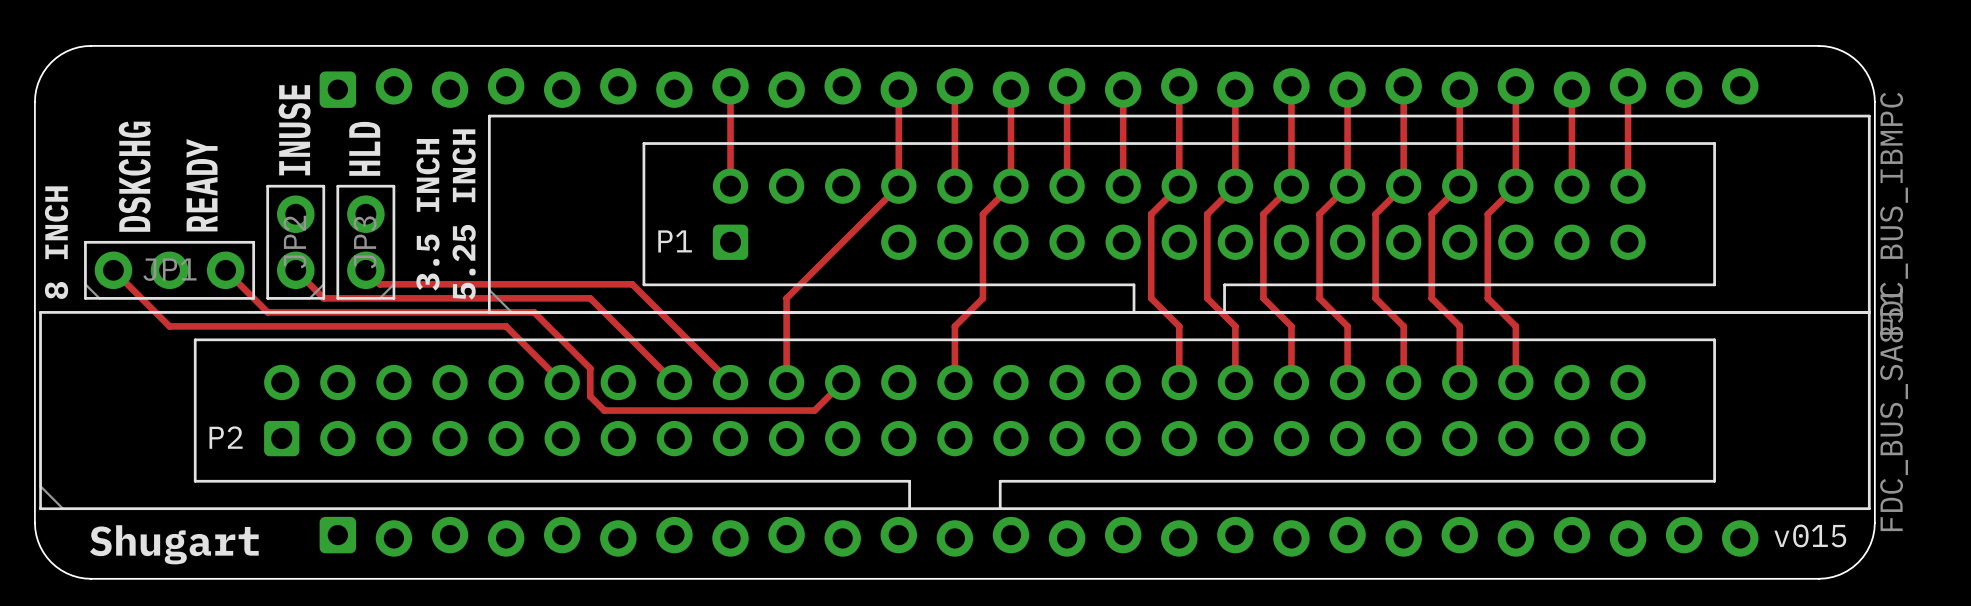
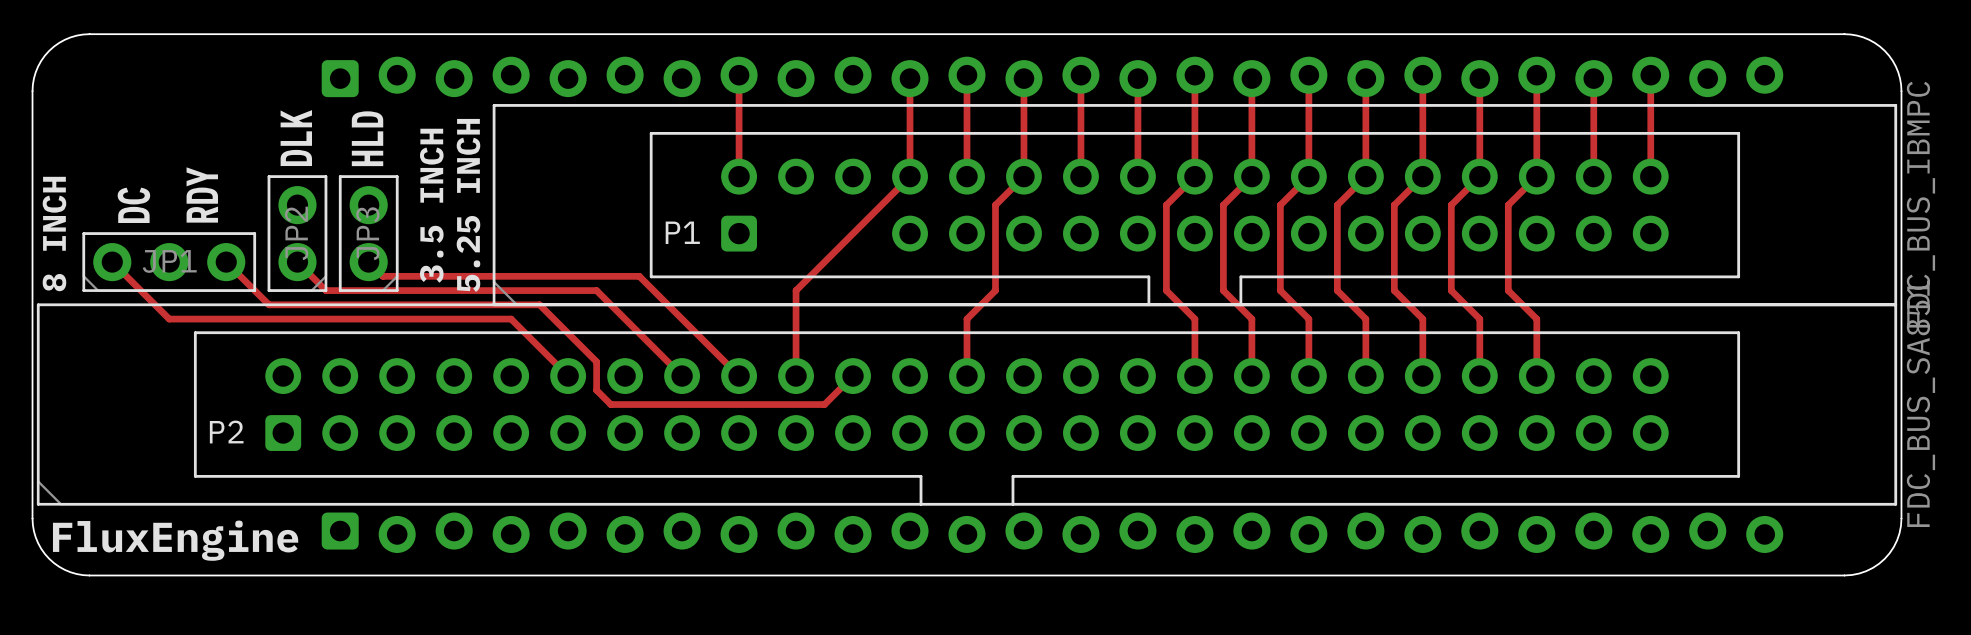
text: INUSE (294, 130) -> DLK (296, 138)
text: DSKCHG (134, 176) -> DC (133, 205)
text: READY (202, 185) -> RDY (202, 194)
text: v015 (1810, 535) -> none
text: Shugart (174, 544) -> FluxEngine (175, 540)

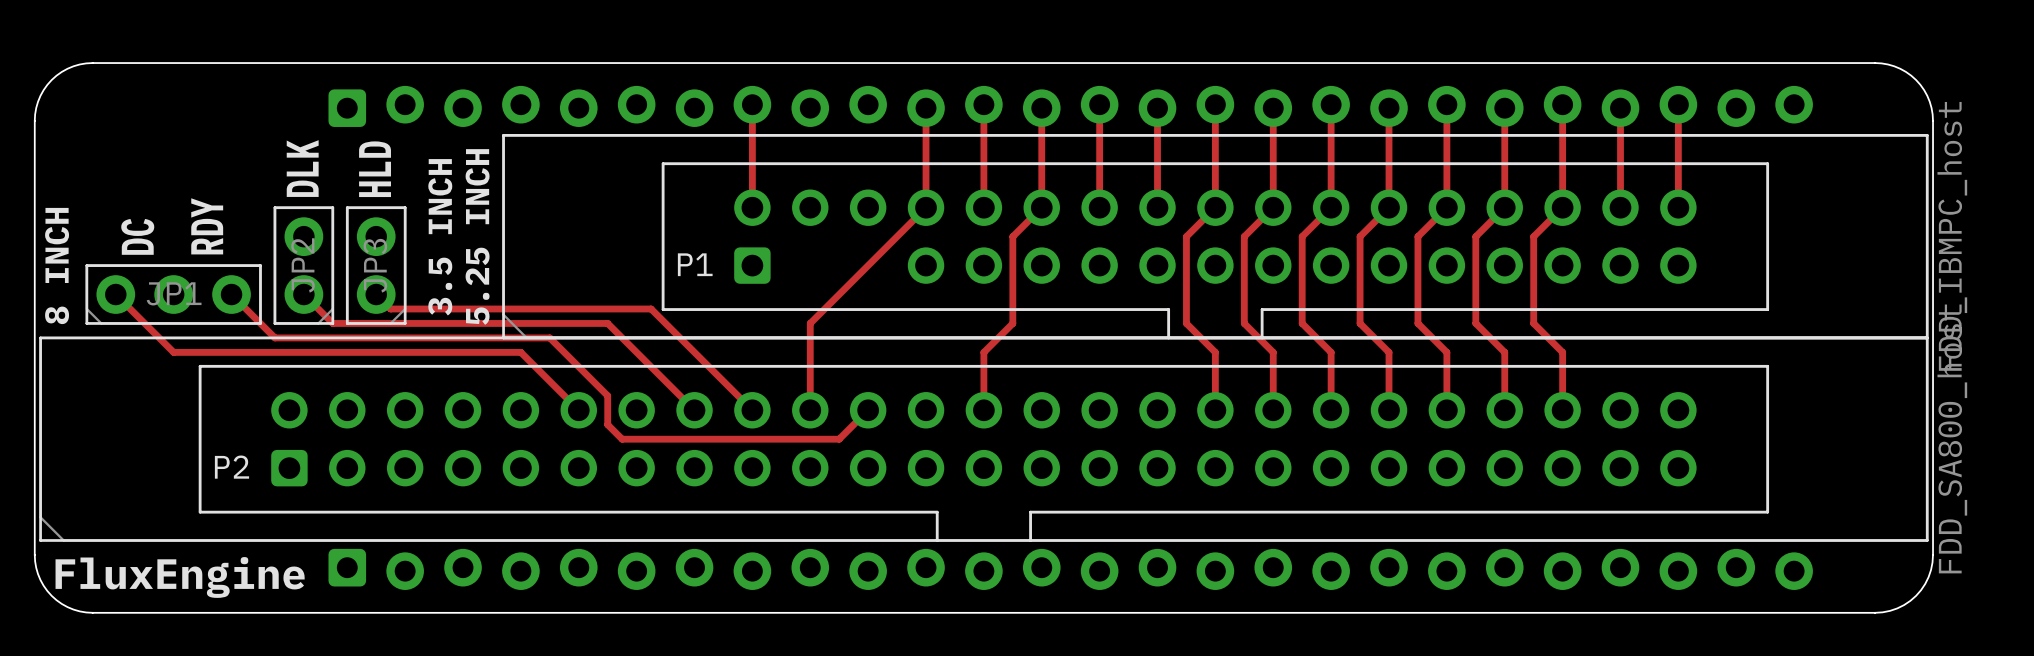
P1 value: FDC_BUS_IBMPC (1920, 204) -> FDD_IBMPC_host (1952, 236)
P2 value: FDC_BUS_SA851 (1920, 403) -> FDD_SA800_host (1952, 438)

